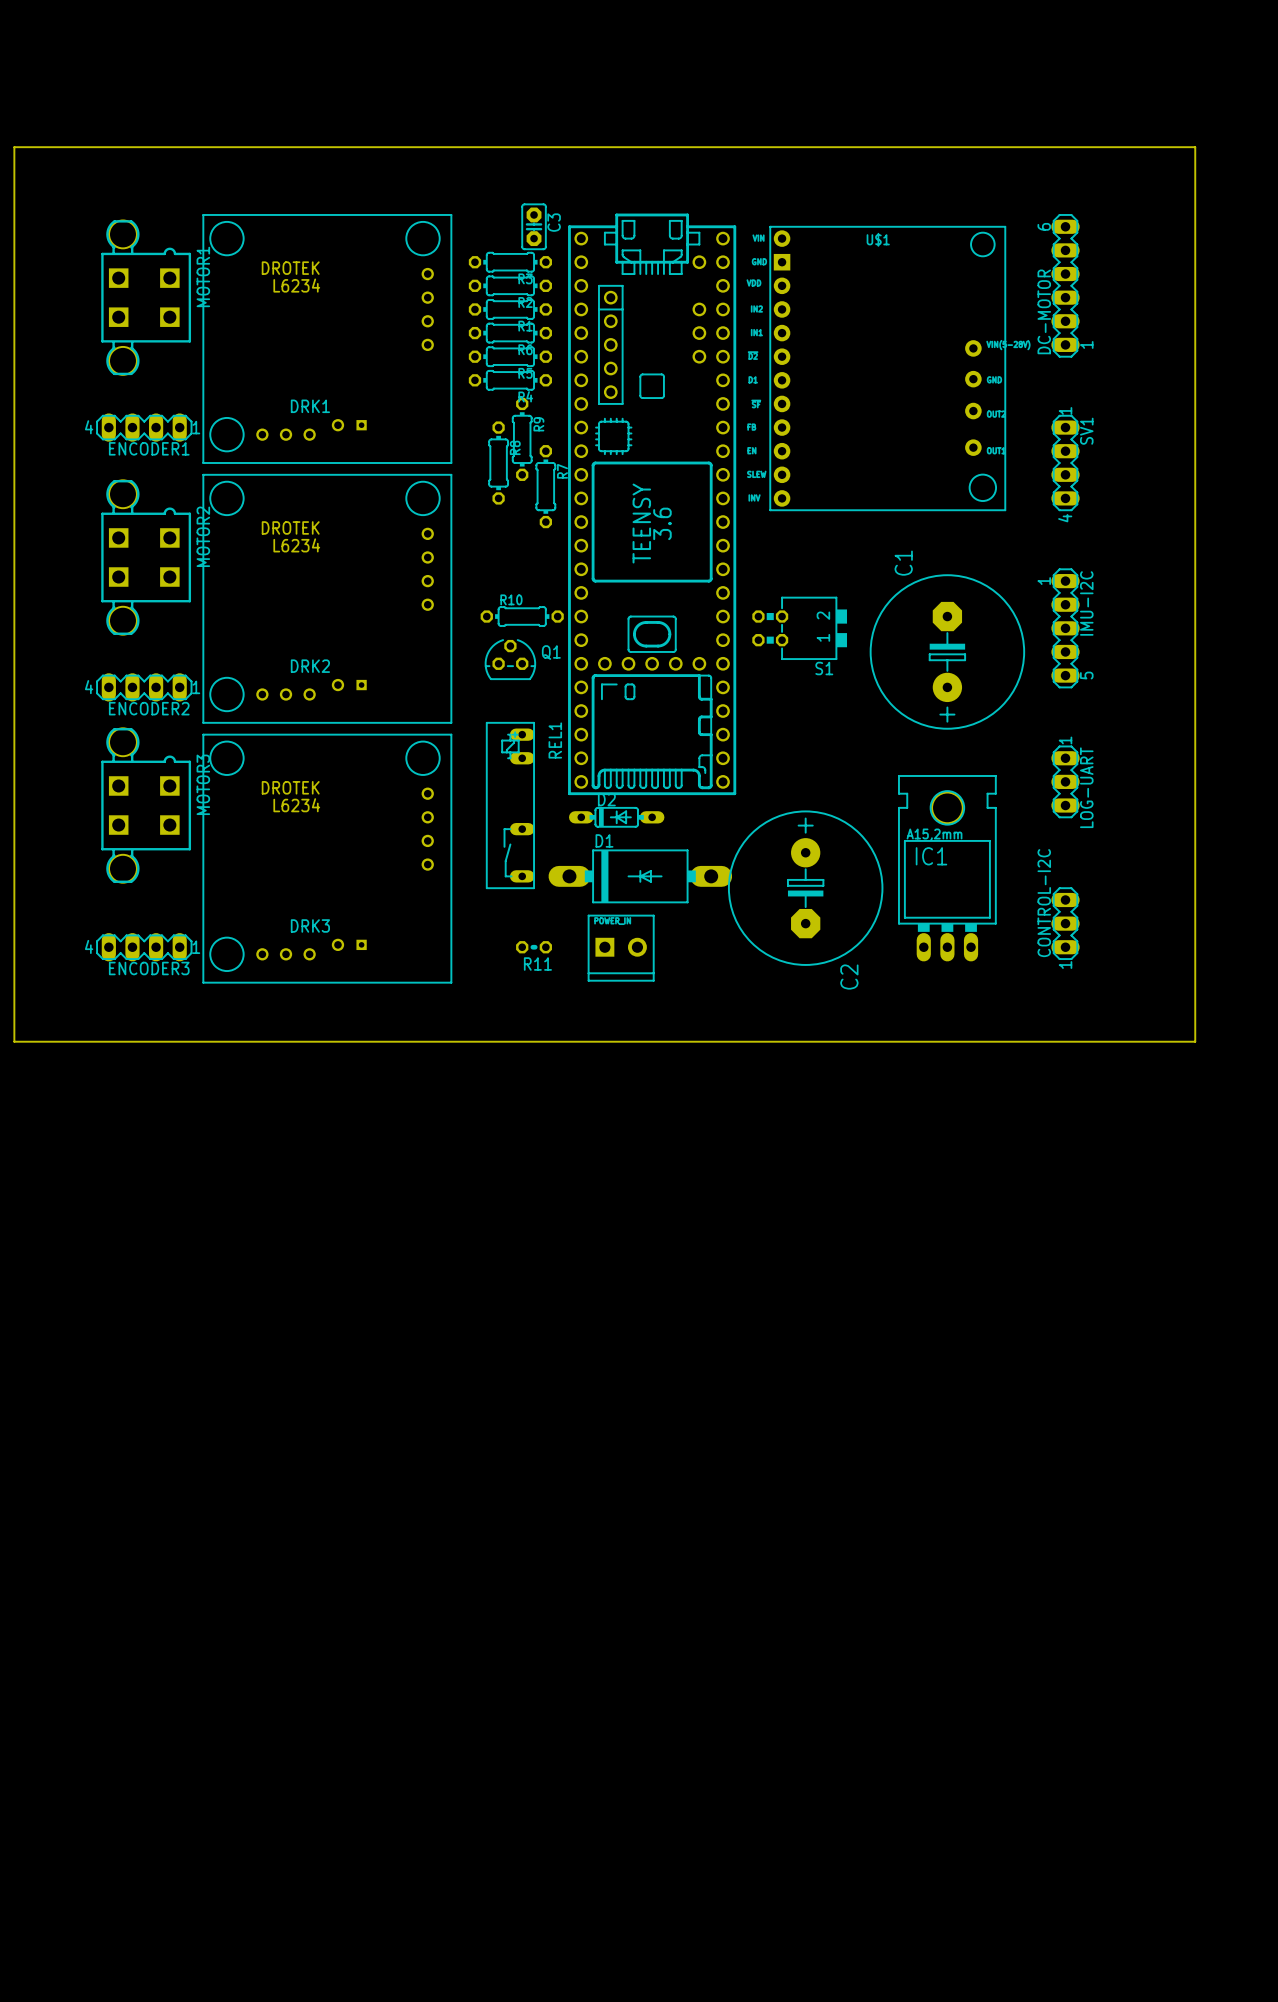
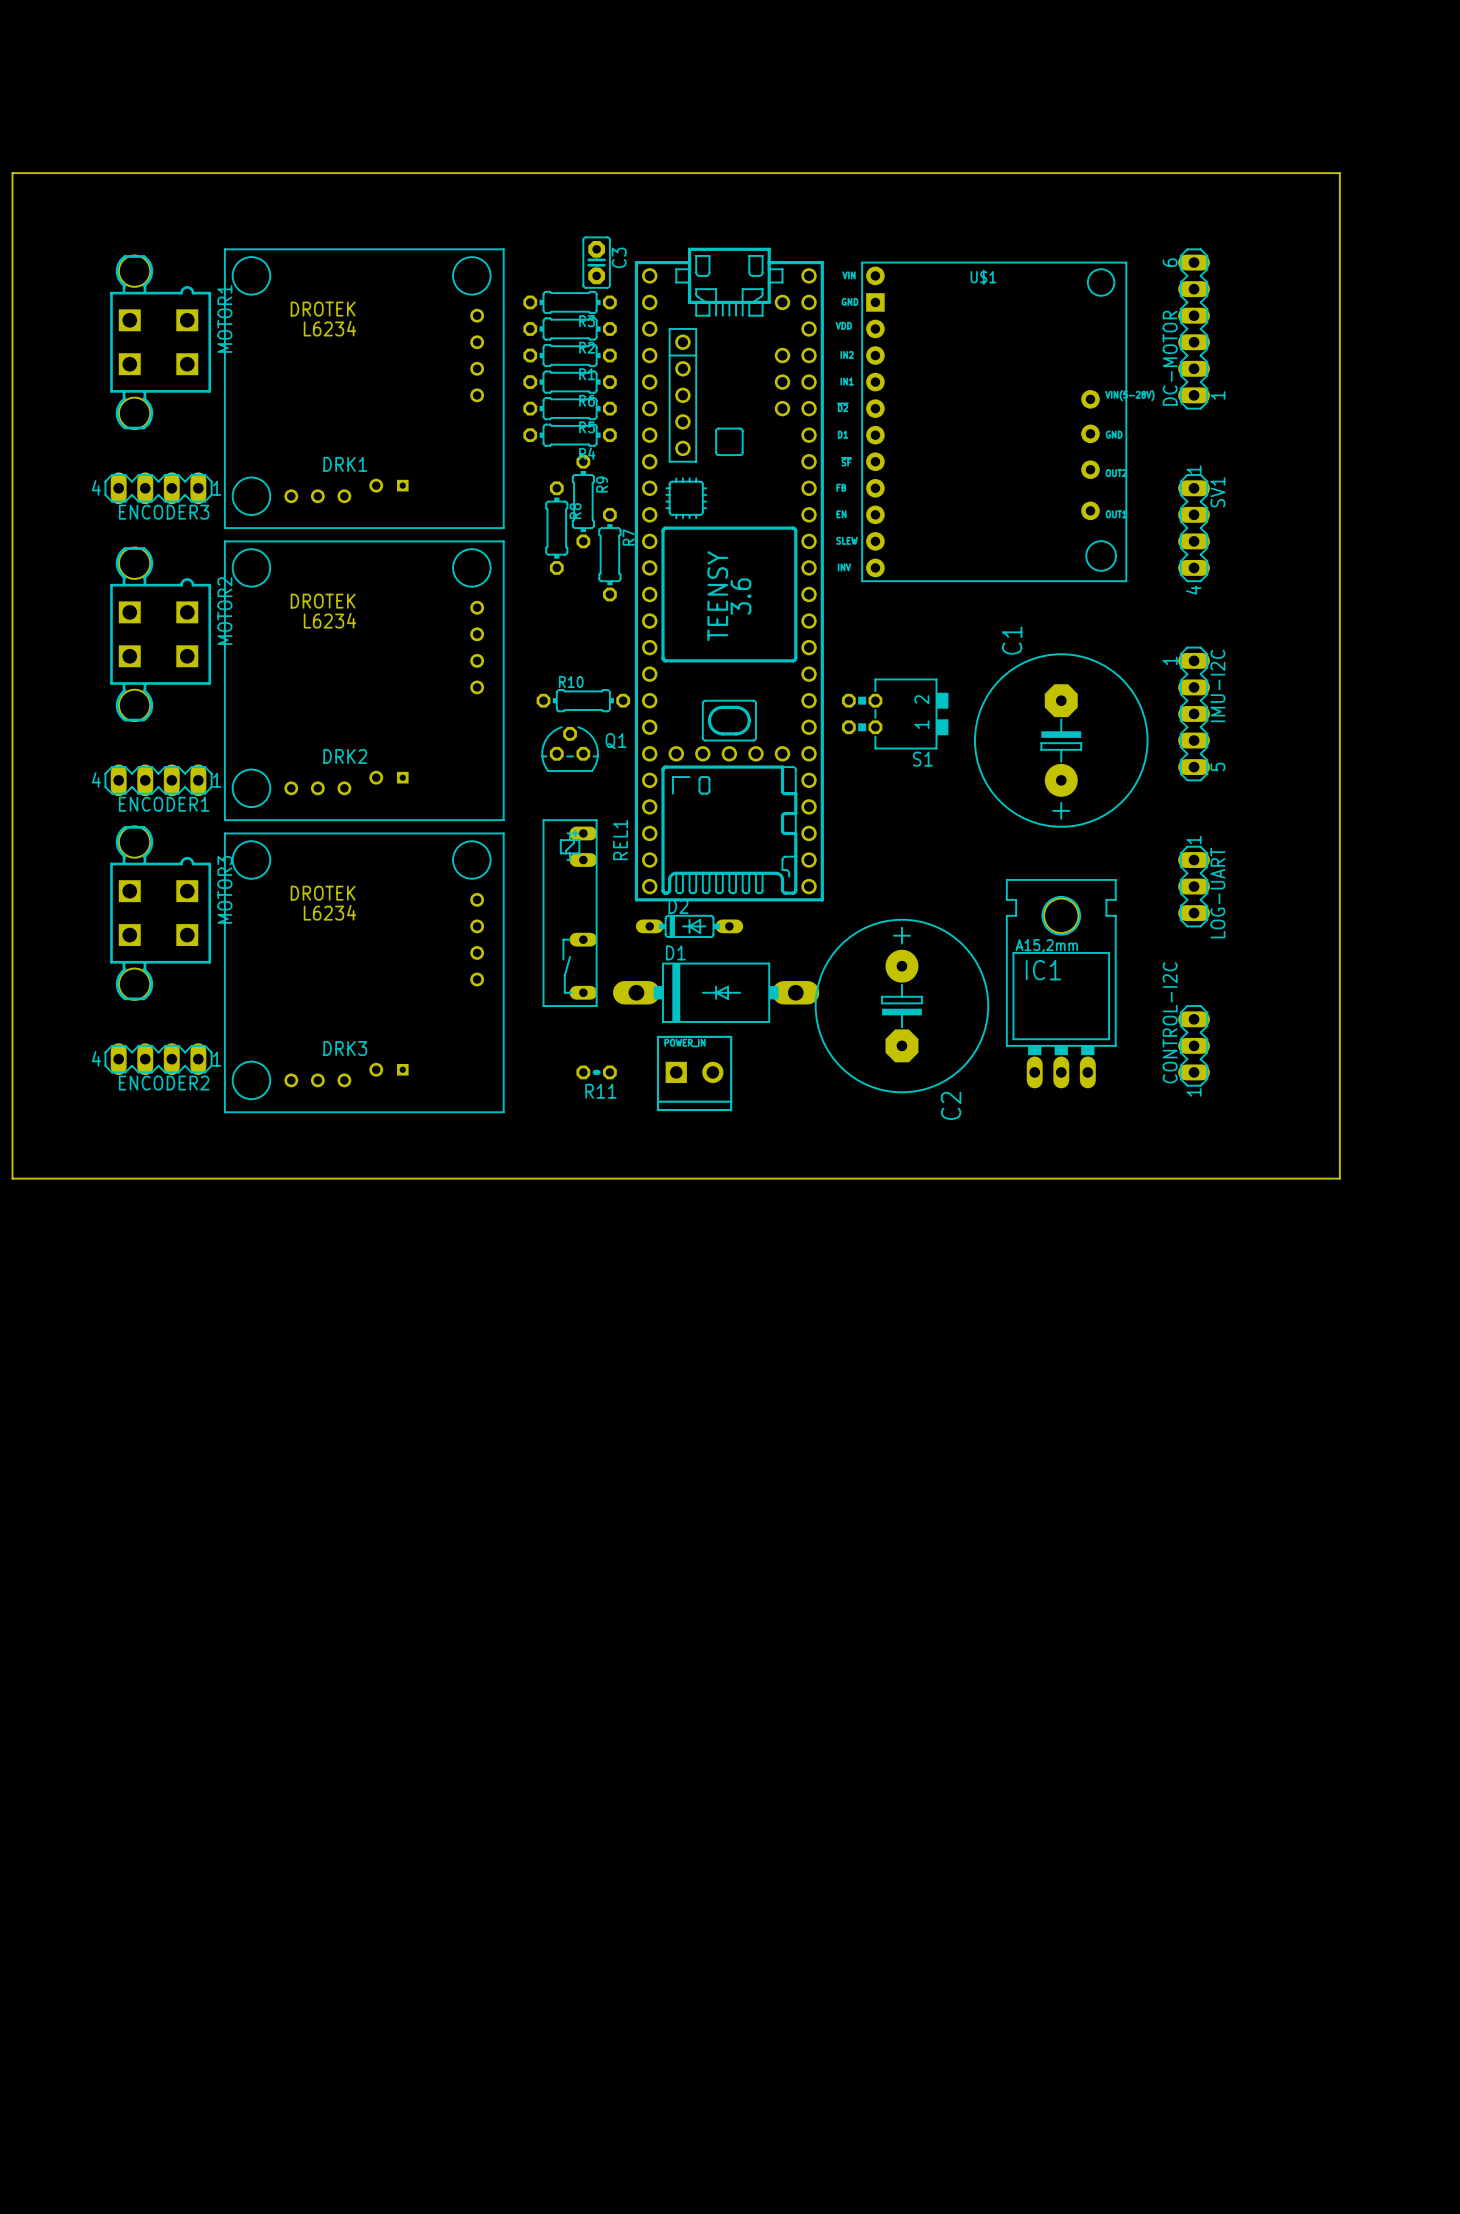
ENCODER1 name: ENCODER1 (149, 448) -> ENCODER3 (164, 512)
ENCODER2 name: ENCODER2 (149, 708) -> ENCODER1 (164, 804)
ENCODER2: none -> (158, 1059)
ENCODER3: (144, 947) -> none

